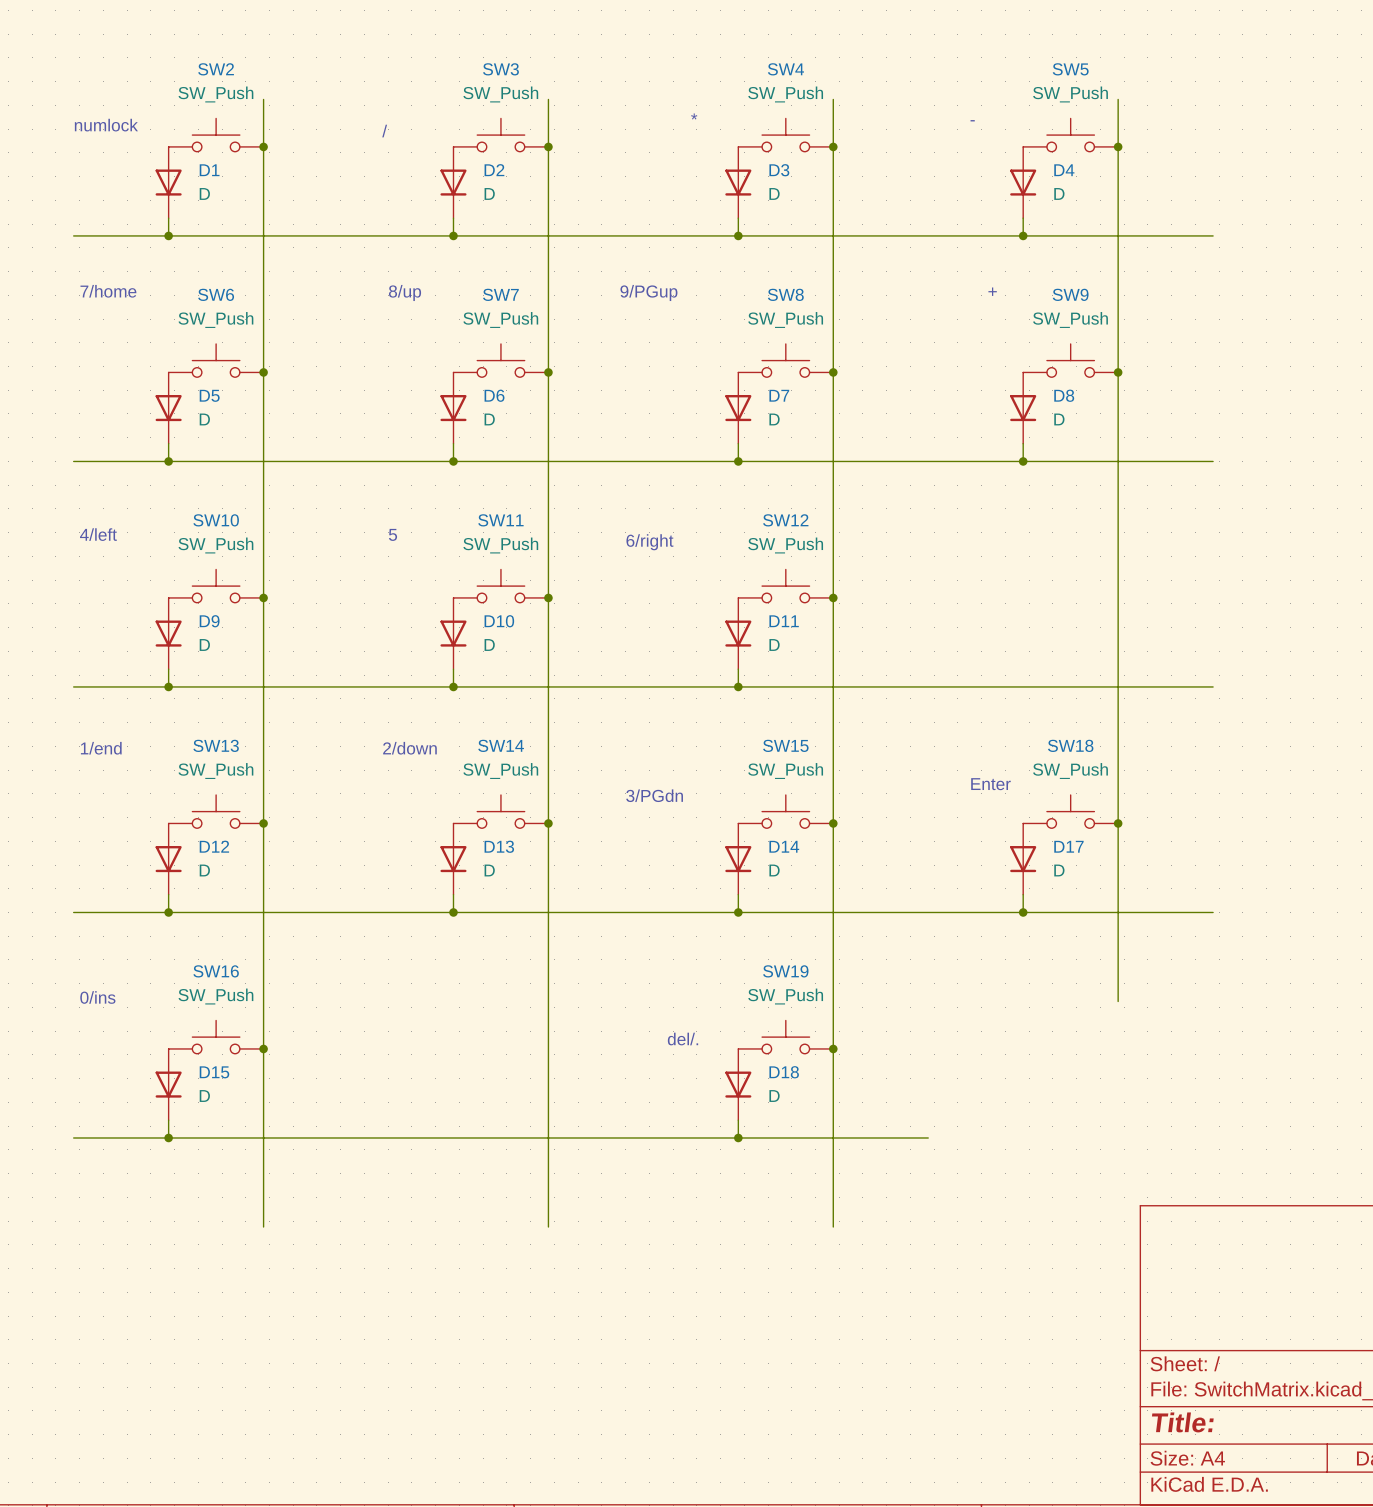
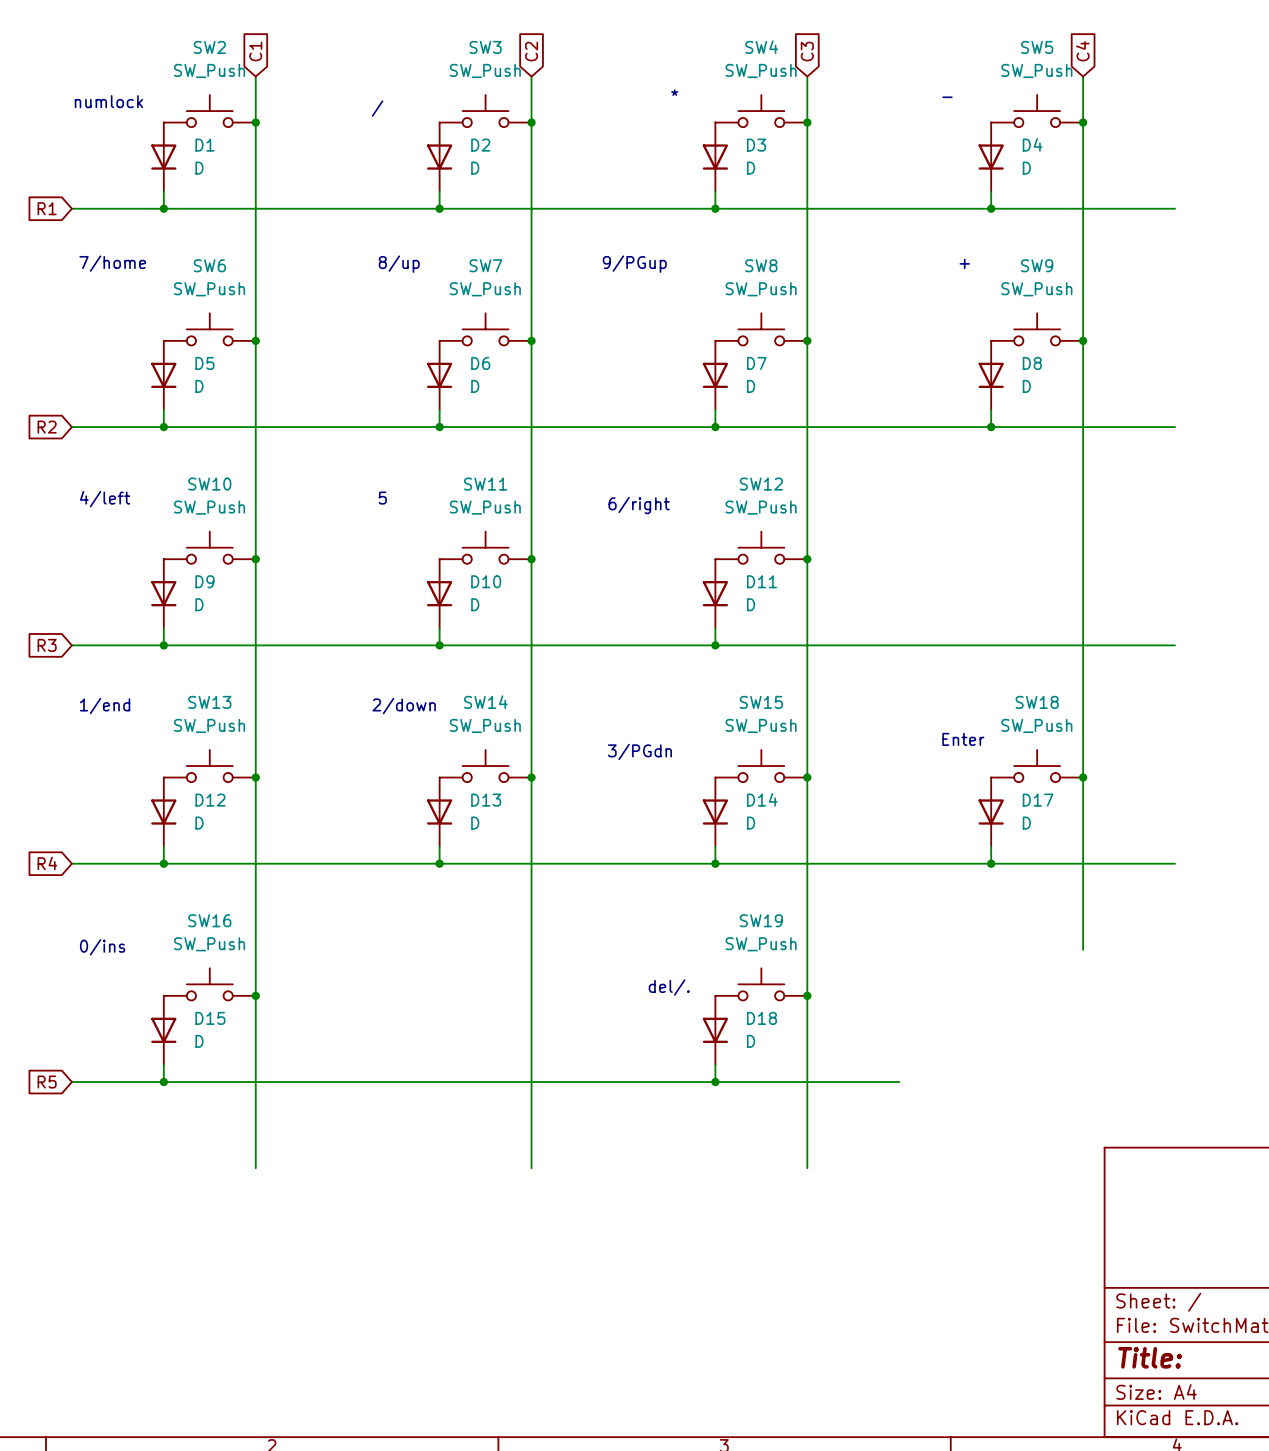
global label: none -> C4 (1082, 51)
global label: none -> C1 (255, 51)
global label: none -> C2 (531, 51)
global label: none -> C3 (807, 51)
global label: none -> R1 (47, 208)
global label: none -> R2 (47, 427)
global label: none -> R3 (47, 645)
global label: none -> R4 (47, 863)
global label: none -> R5 (47, 1082)

